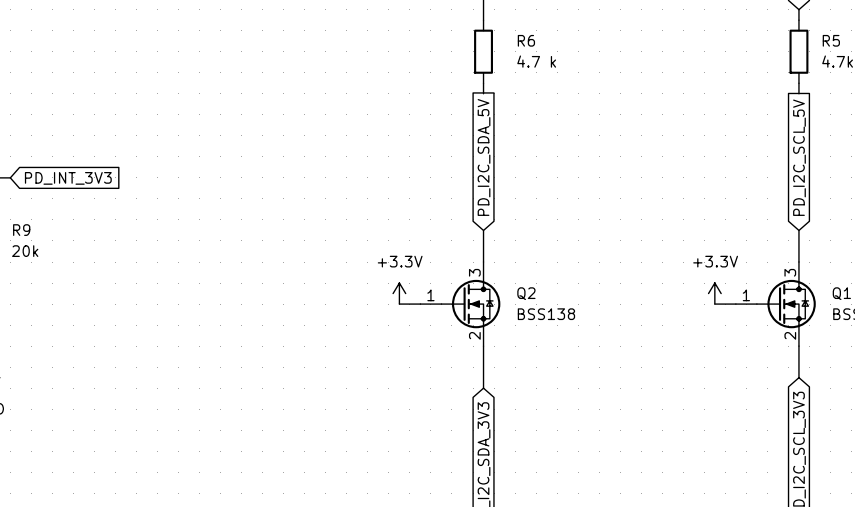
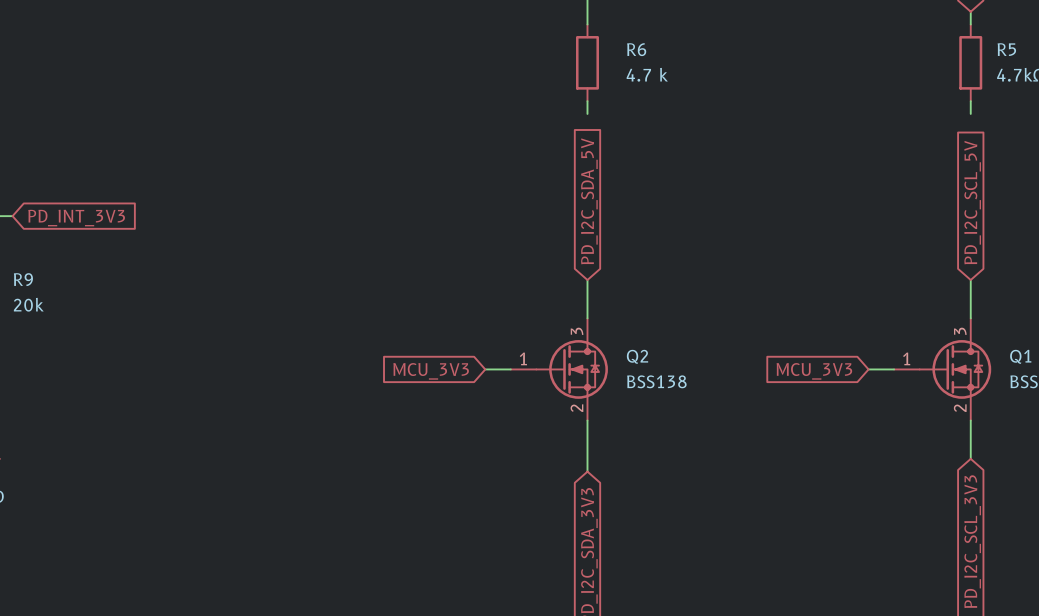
power symbol: +3.3V (399, 293) -> none
power symbol: +3.3V (714, 293) -> none
global label: none -> MCU_3V3 (431, 371)
global label: none -> MCU_3V3 (814, 371)

